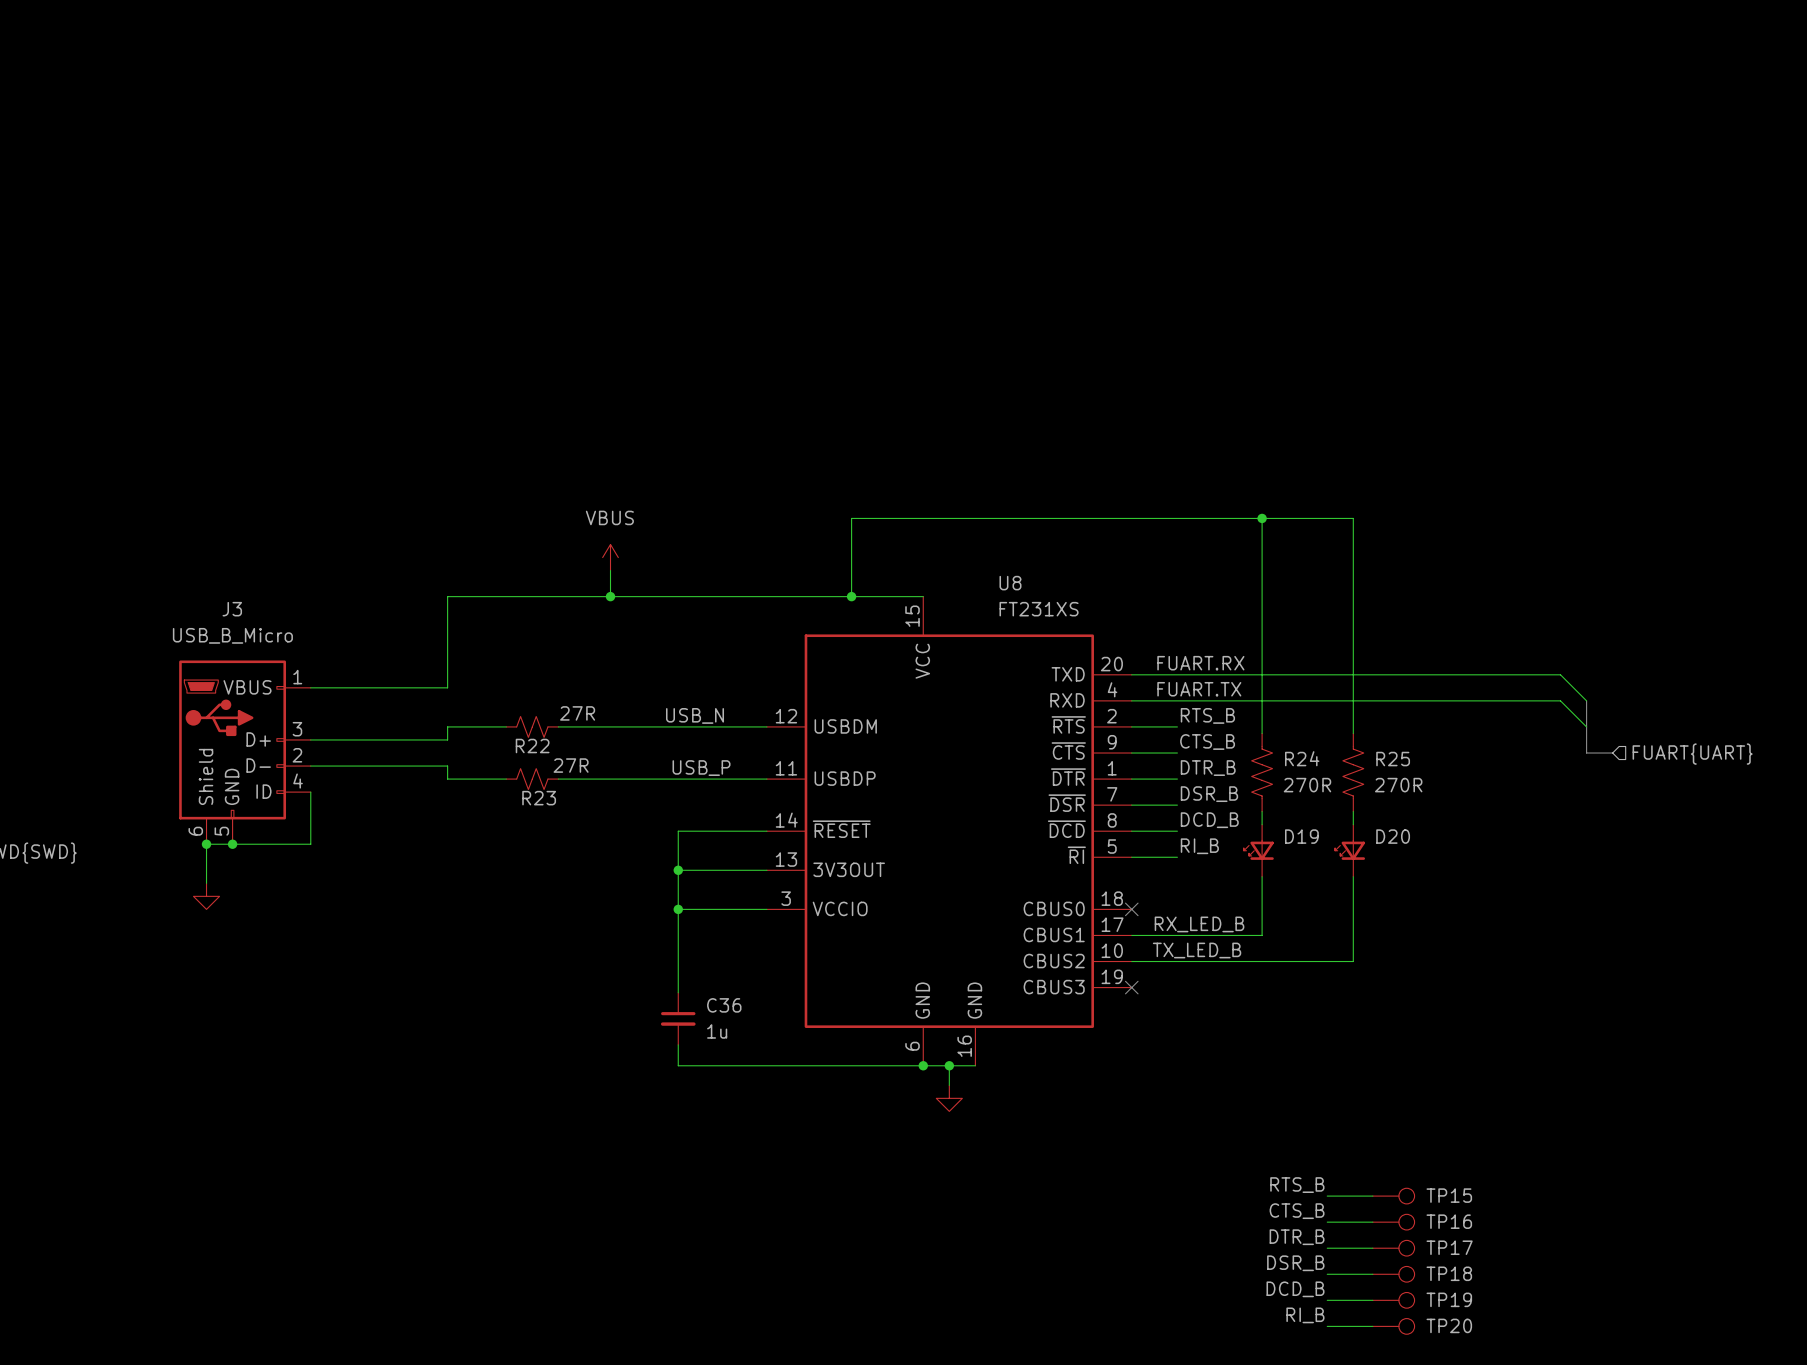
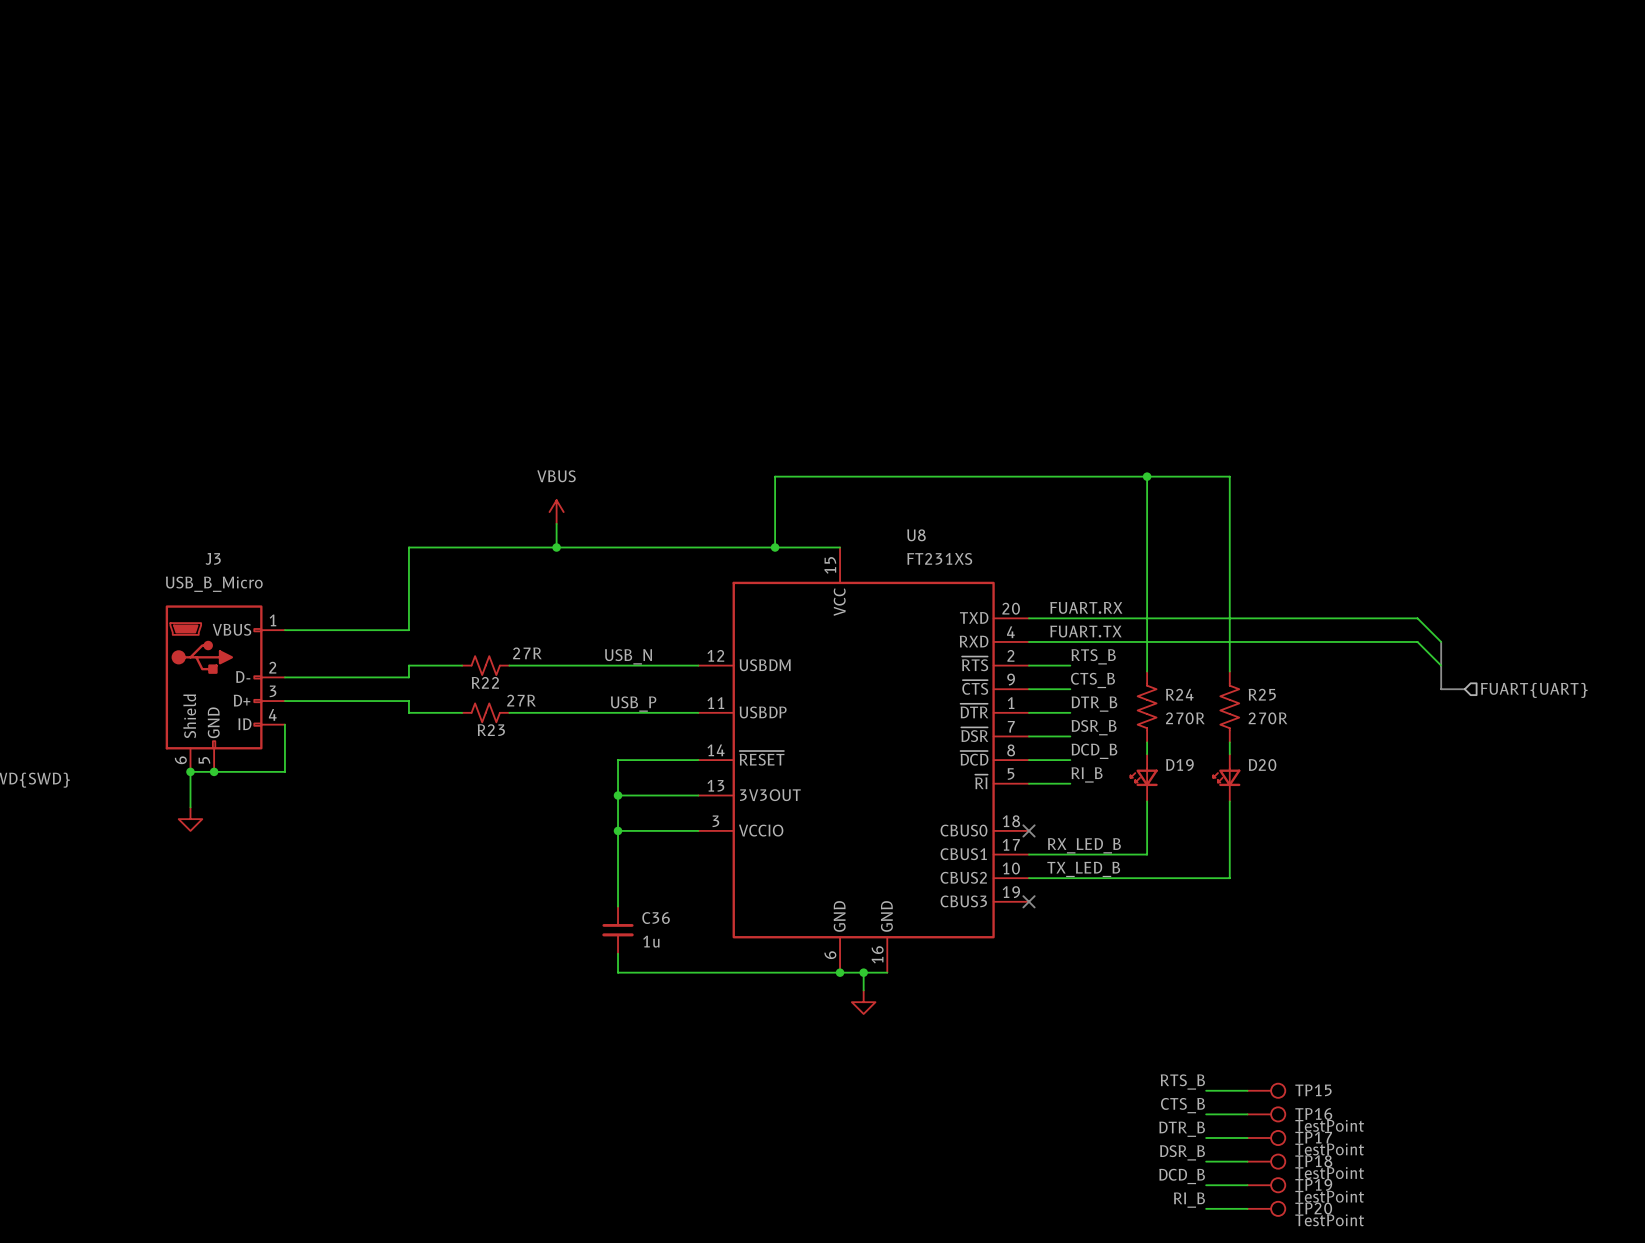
J3 pin number: 3 (297, 729) -> 2 (272, 667)
J3 pin name: D+ (258, 739) -> D- (243, 677)
J3 pin number: 2 (297, 755) -> 3 (272, 691)
J3 pin name: D- (258, 765) -> D+ (242, 700)
TP16 value: none -> TestPoint (1329, 1125)
TP17 value: none -> TestPoint (1329, 1149)
TP18 value: none -> TestPoint (1329, 1173)
TP19 value: none -> TestPoint (1329, 1196)
TP20 value: none -> TestPoint (1329, 1220)

